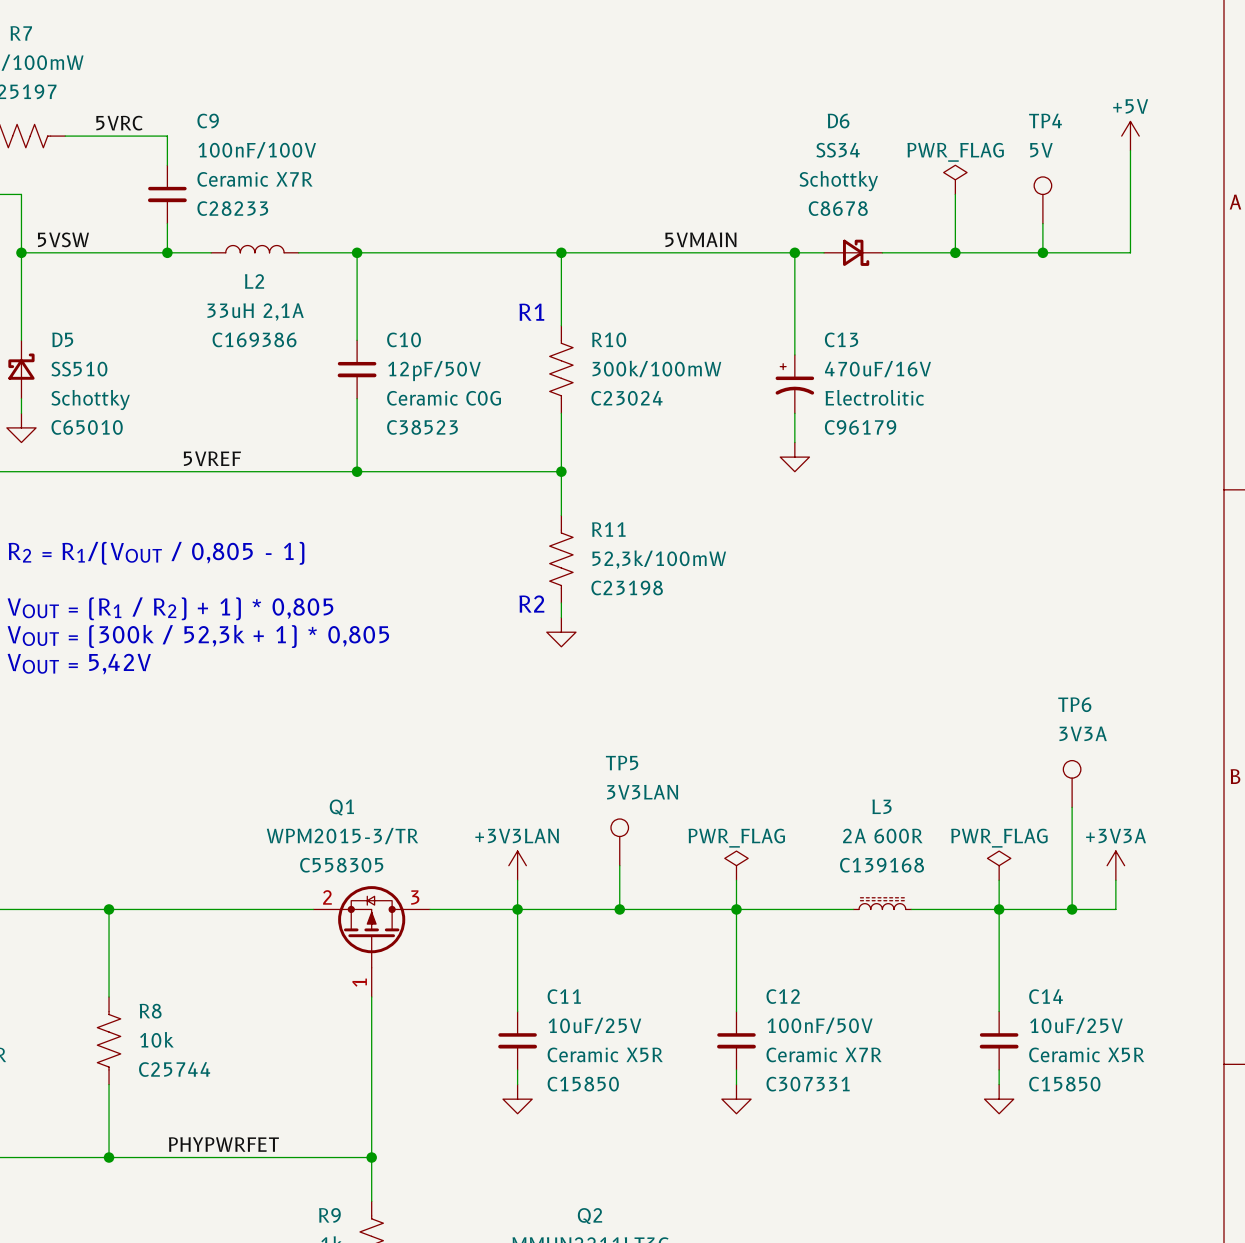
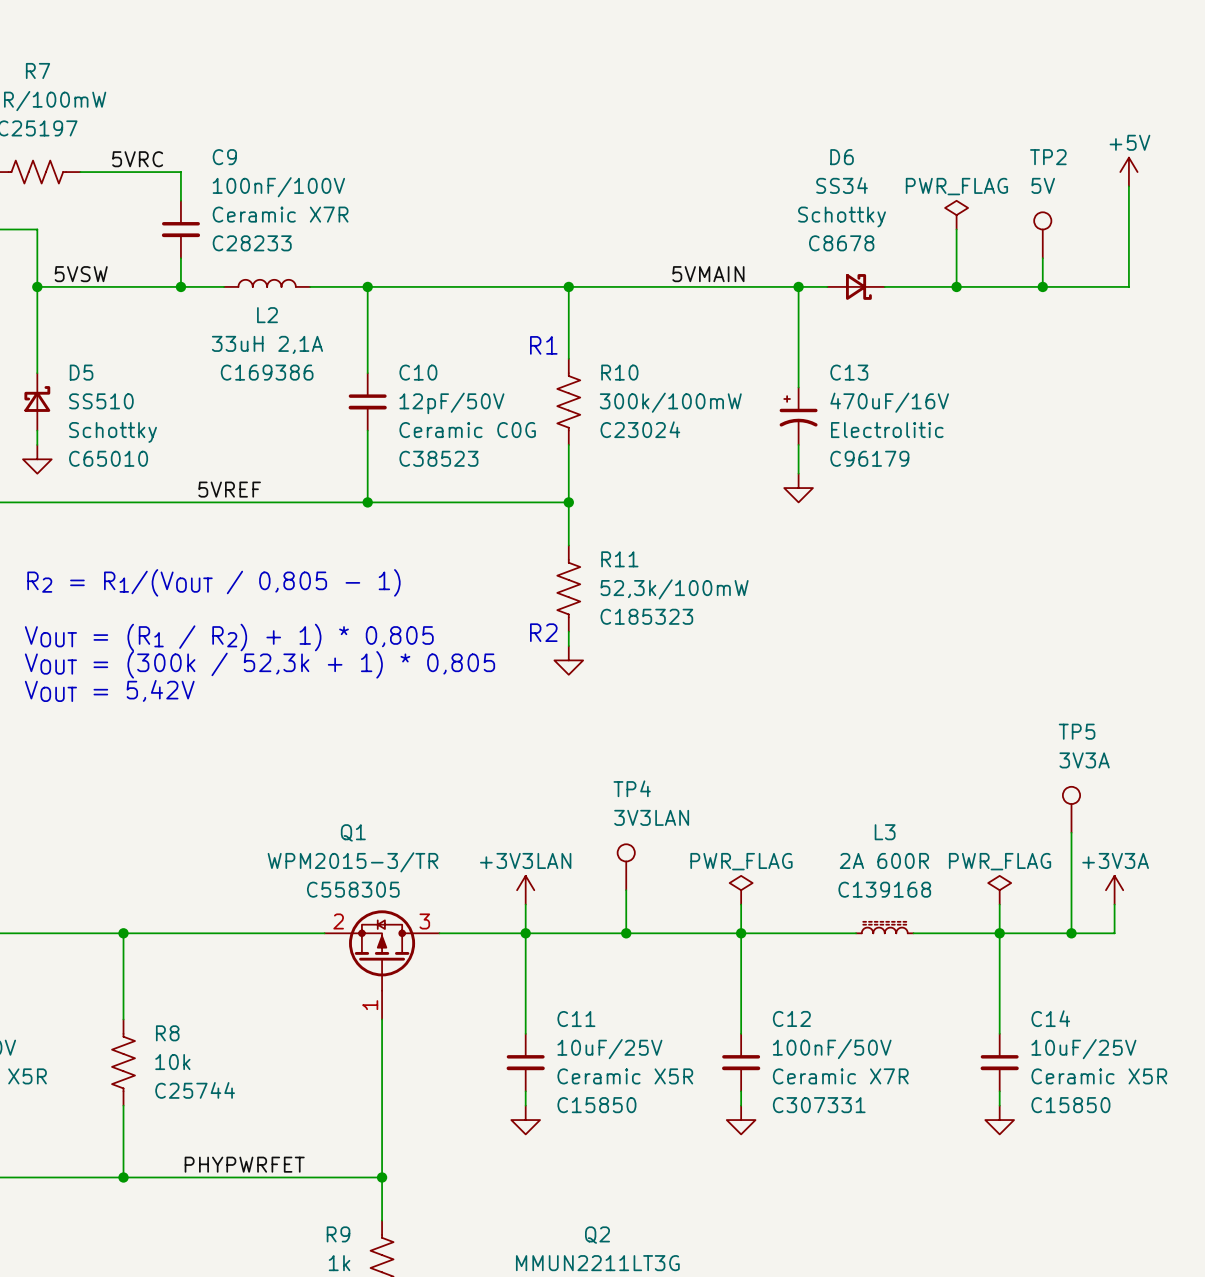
TP4 name: TP4 (1045, 120) -> TP2 (1048, 157)
R11 text: C23198 (627, 587) -> C185323 (646, 616)
TP6 name: TP6 (1074, 704) -> TP5 (1077, 731)
TP5 name: TP5 (622, 763) -> TP4 (632, 788)

